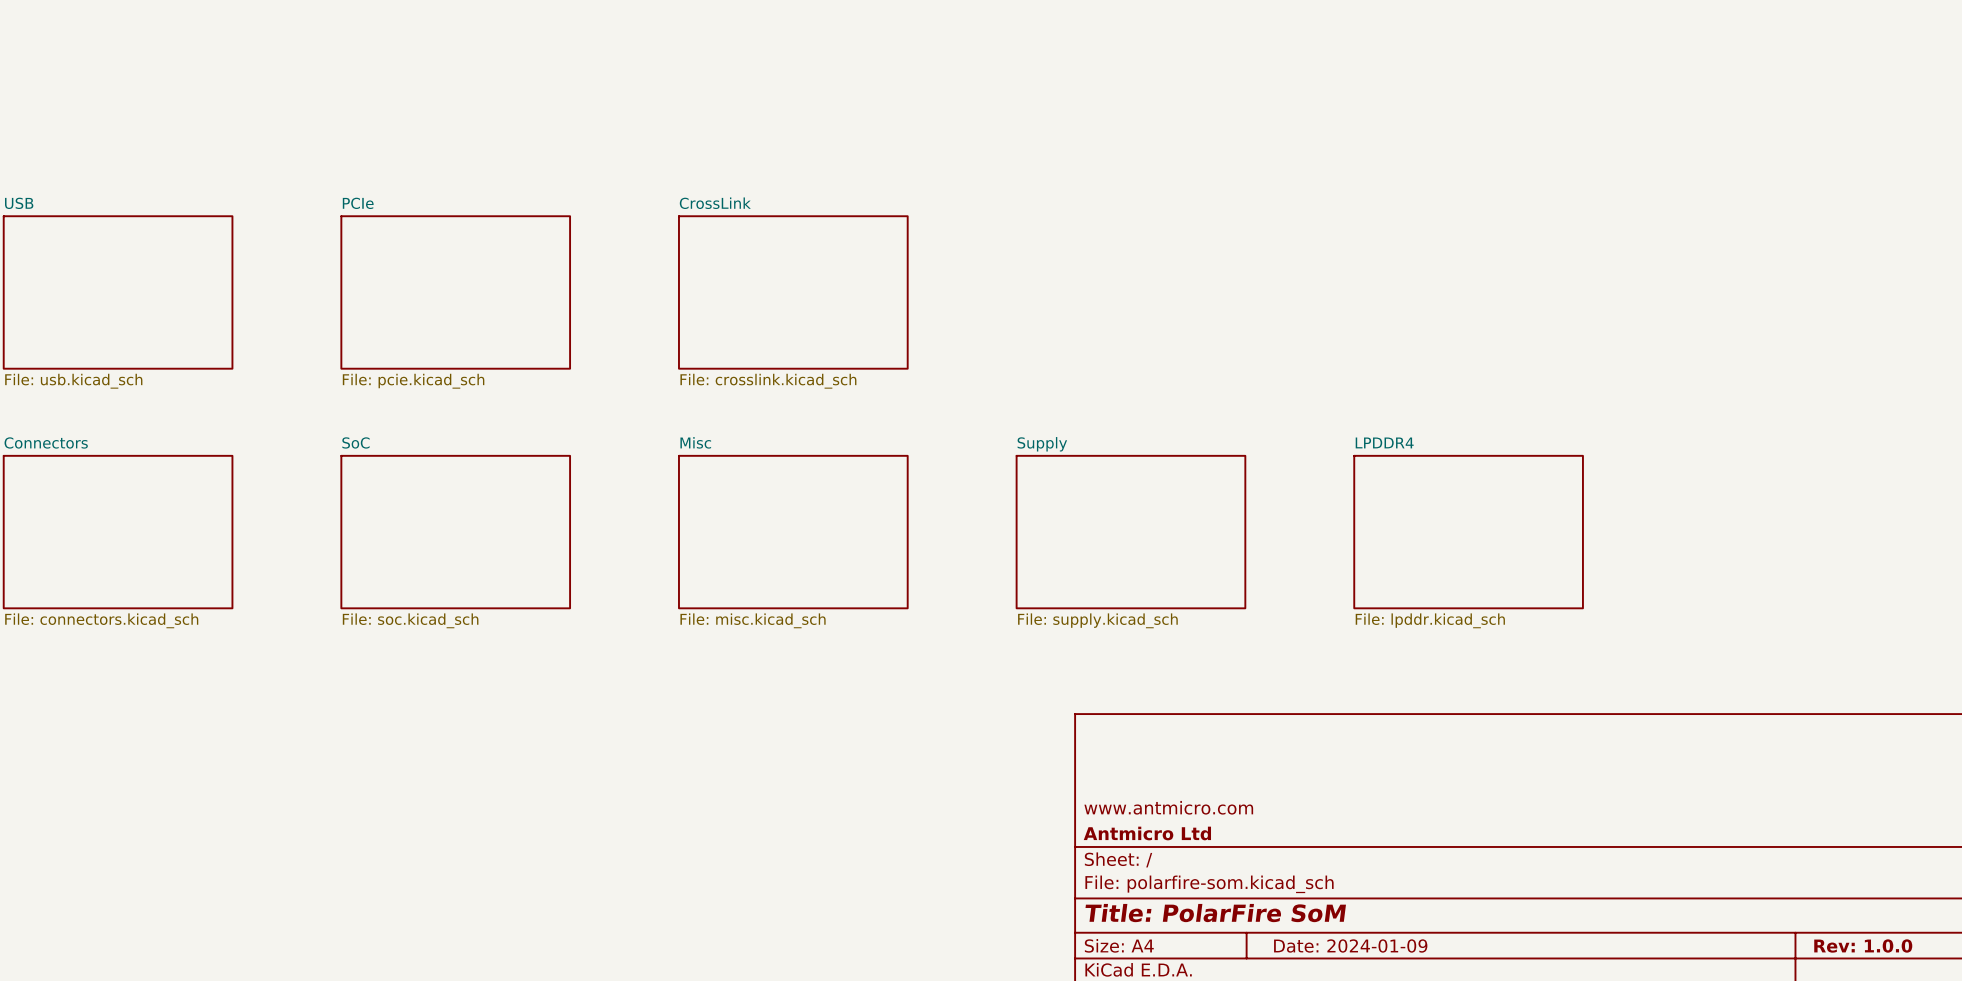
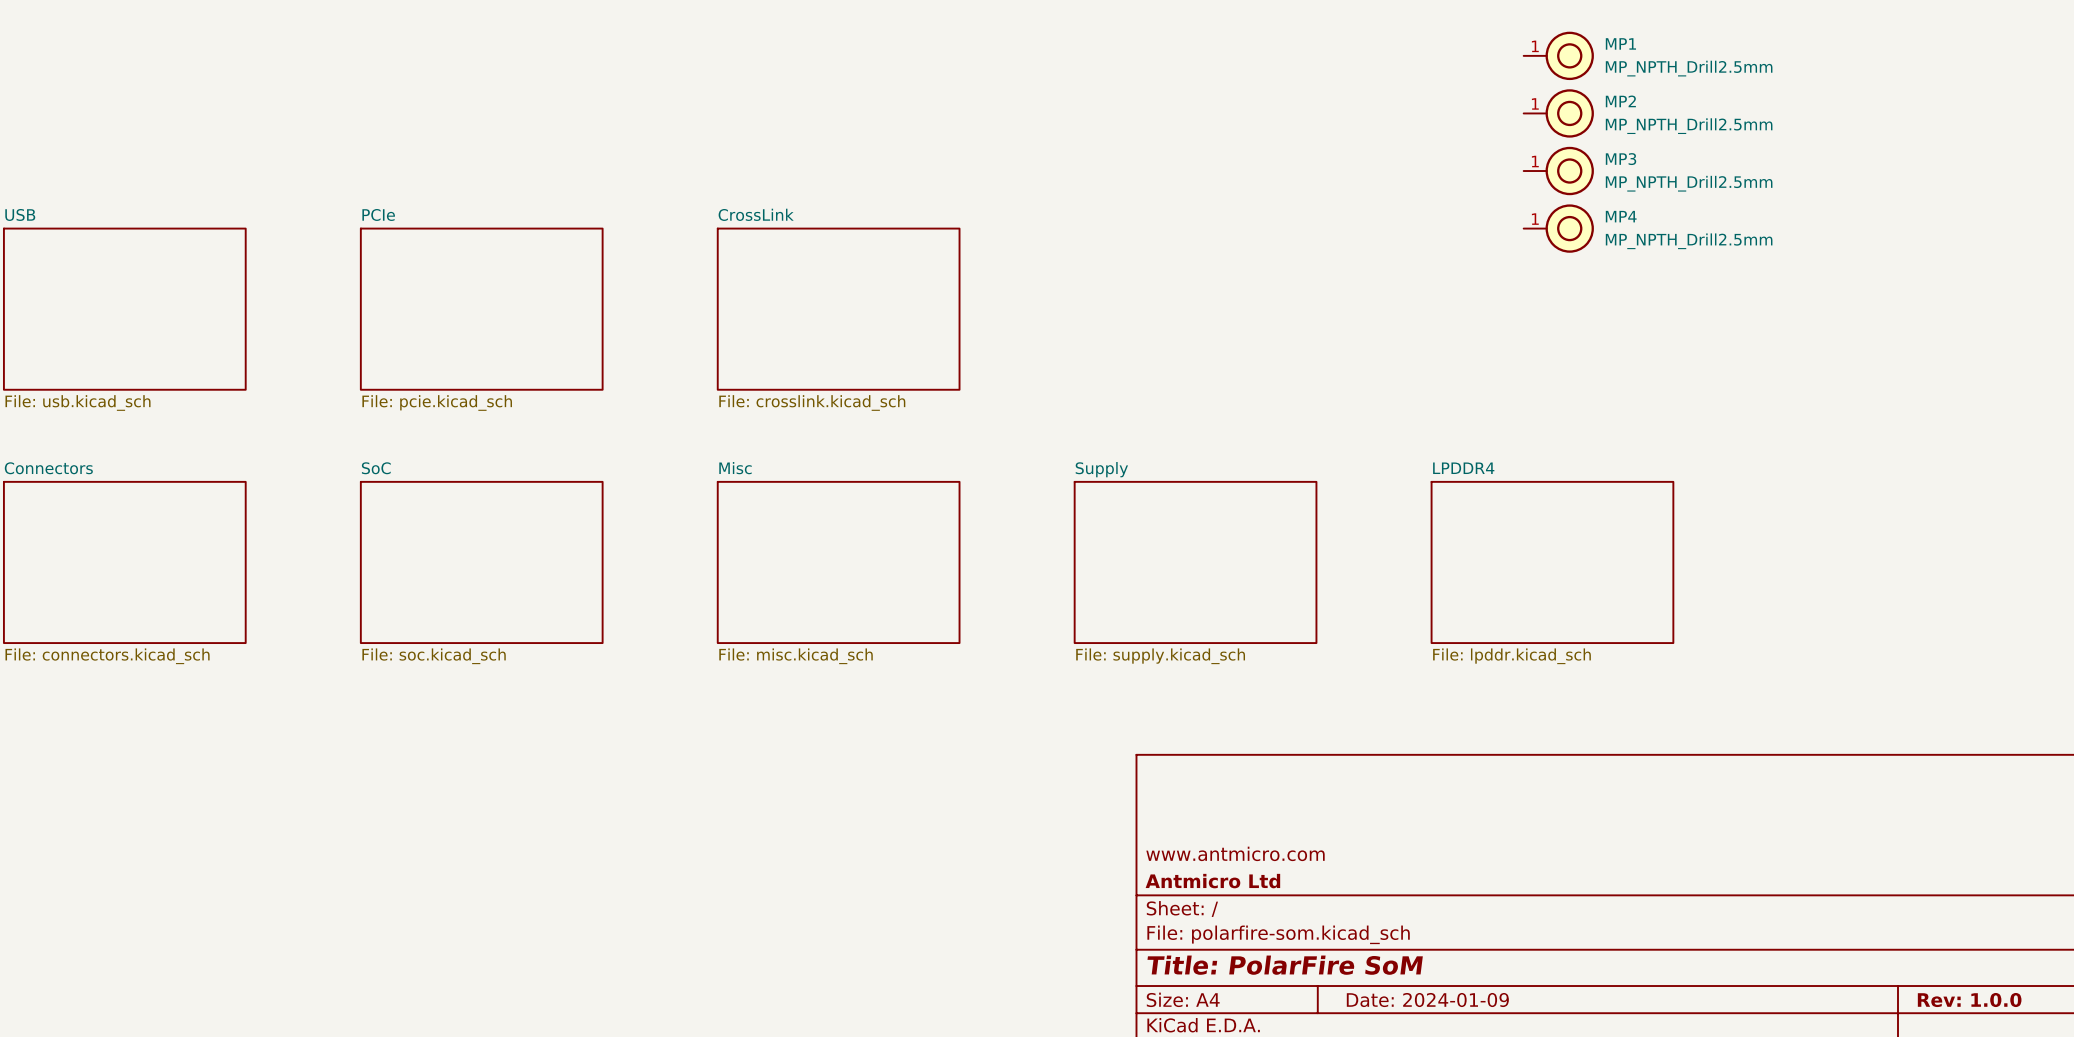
MP1: none -> MP_NPTH_Drill2.5mm (1558, 55)
MP2: none -> MP_NPTH_Drill2.5mm (1558, 113)
MP3: none -> MP_NPTH_Drill2.5mm (1558, 171)
MP4: none -> MP_NPTH_Drill2.5mm (1558, 228)

